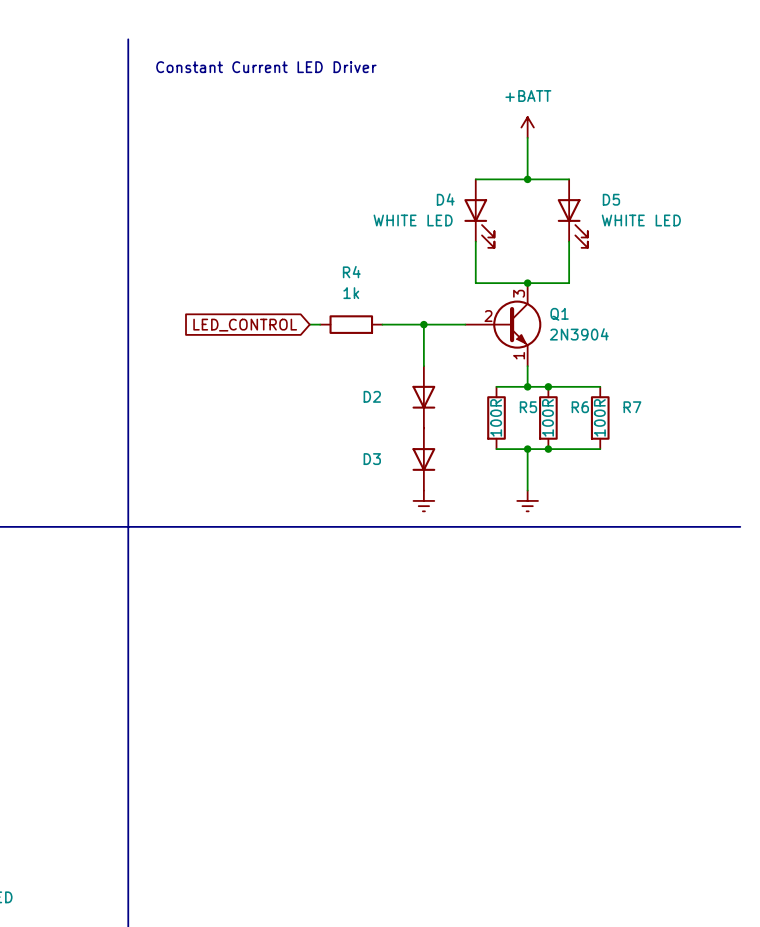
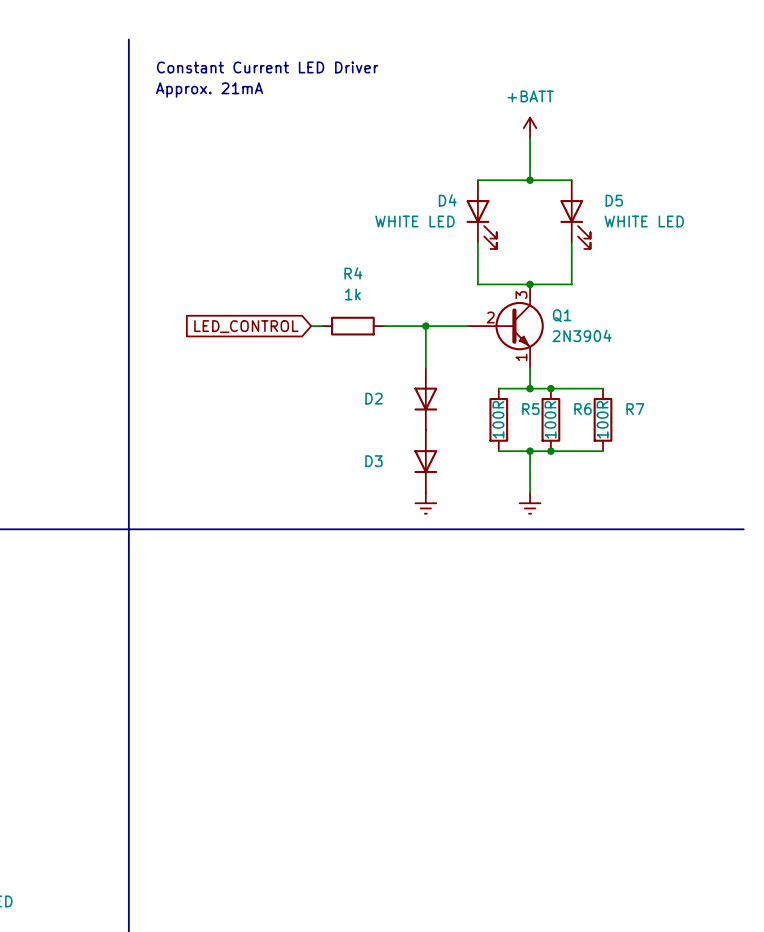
text: none -> Approx. 21mA (209, 90)

